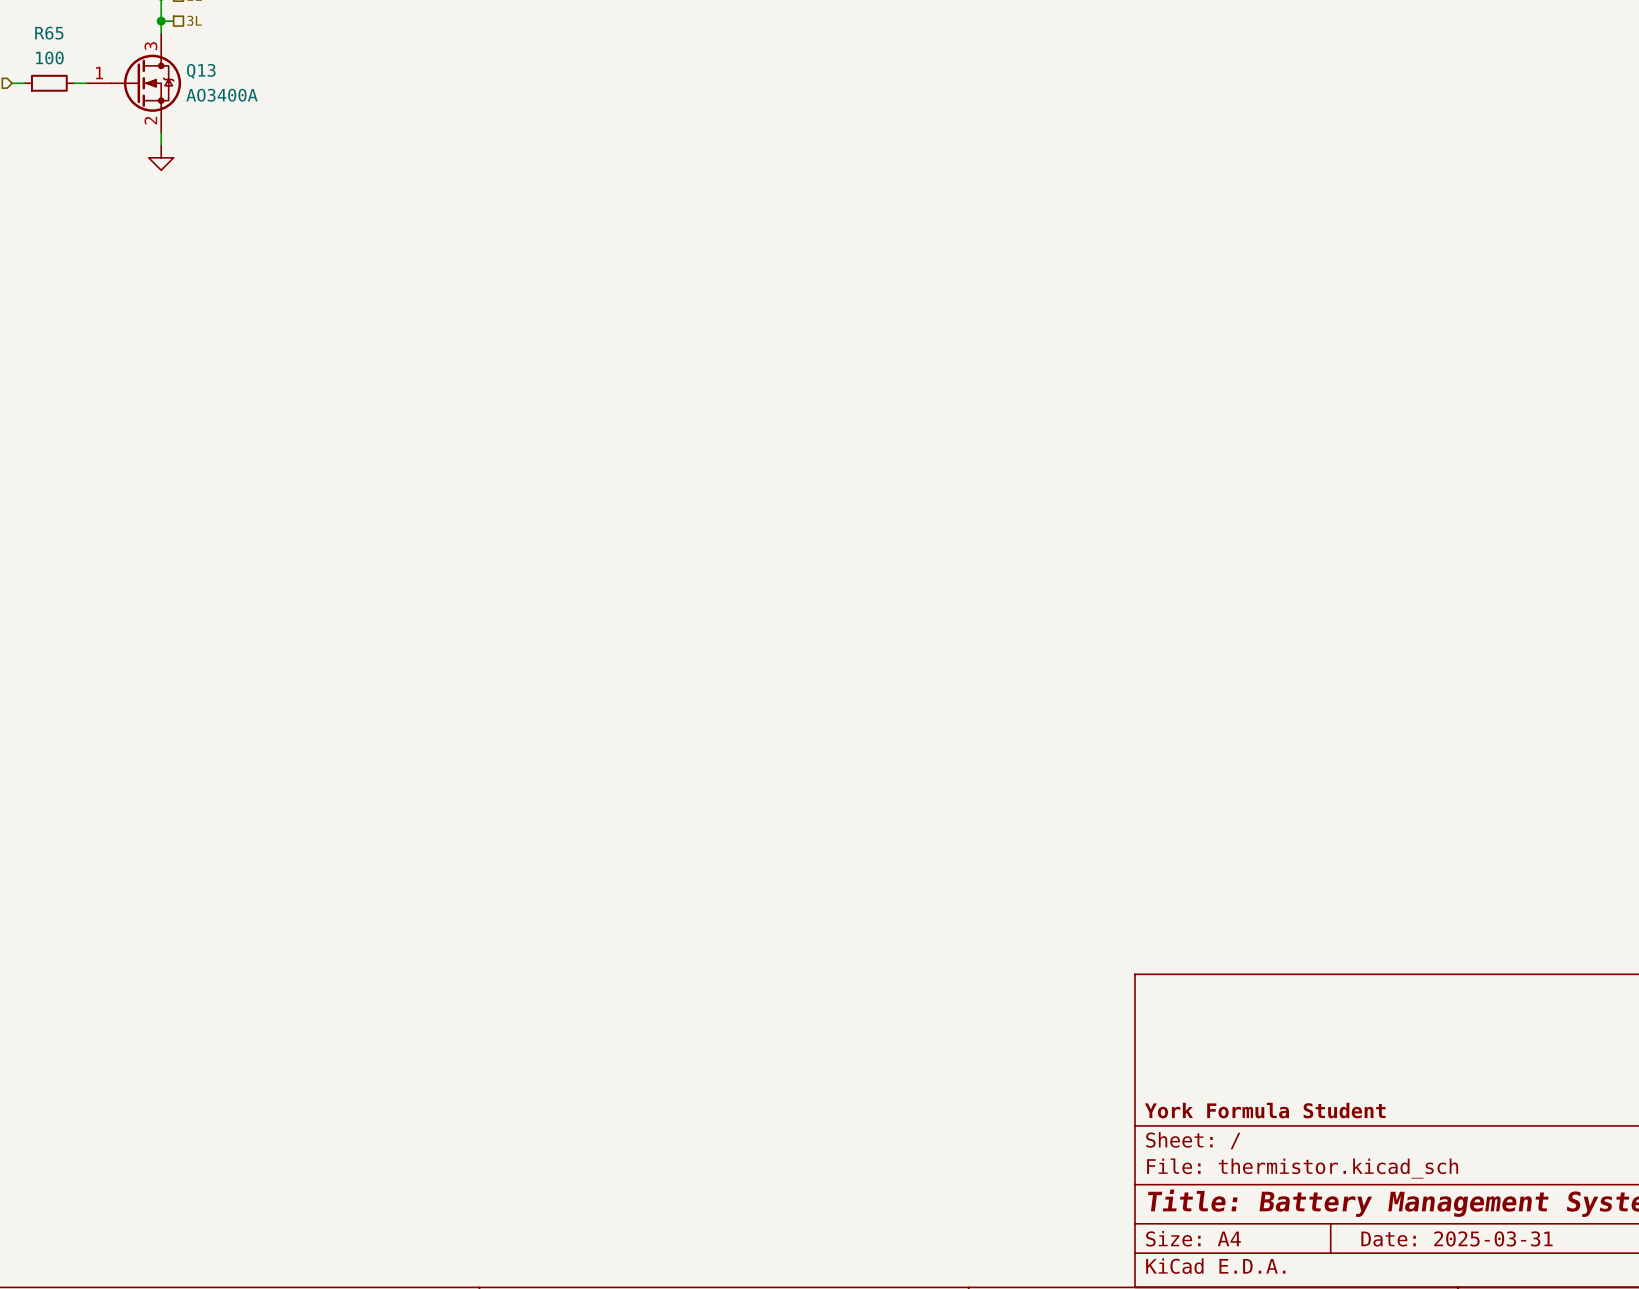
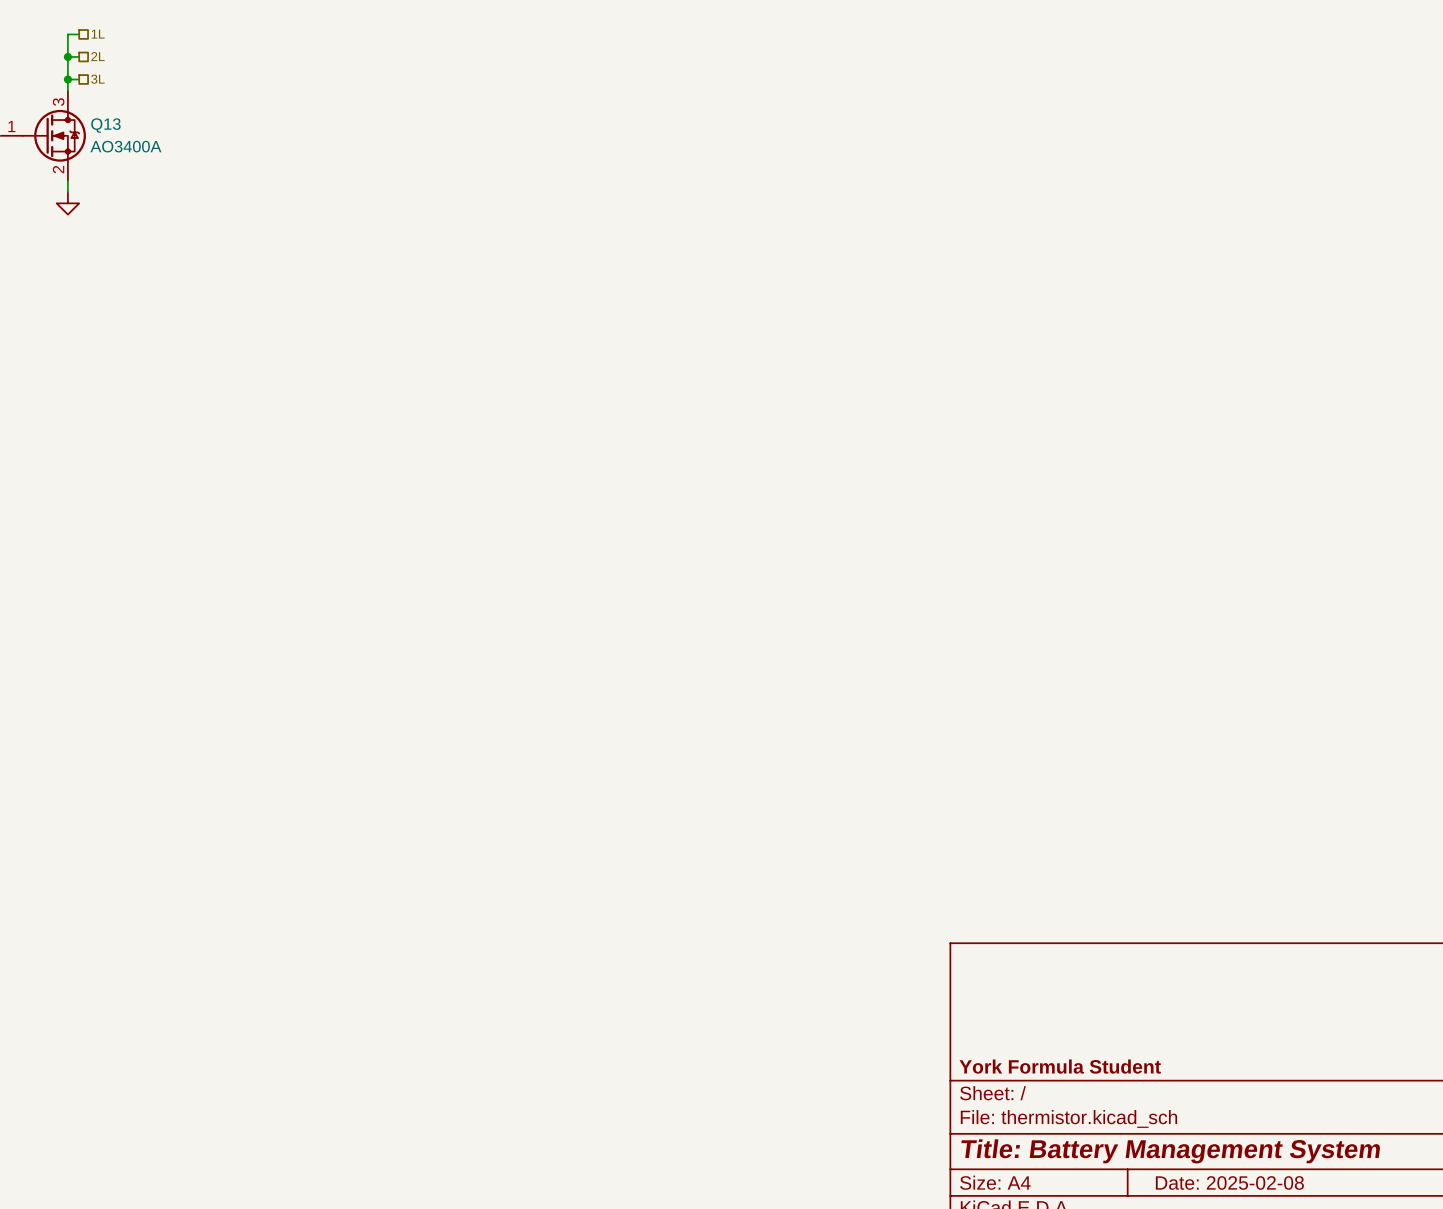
title block: Date: 2025-03-31 (1456, 1238) -> Date: 2025-02-08 (1229, 1182)

